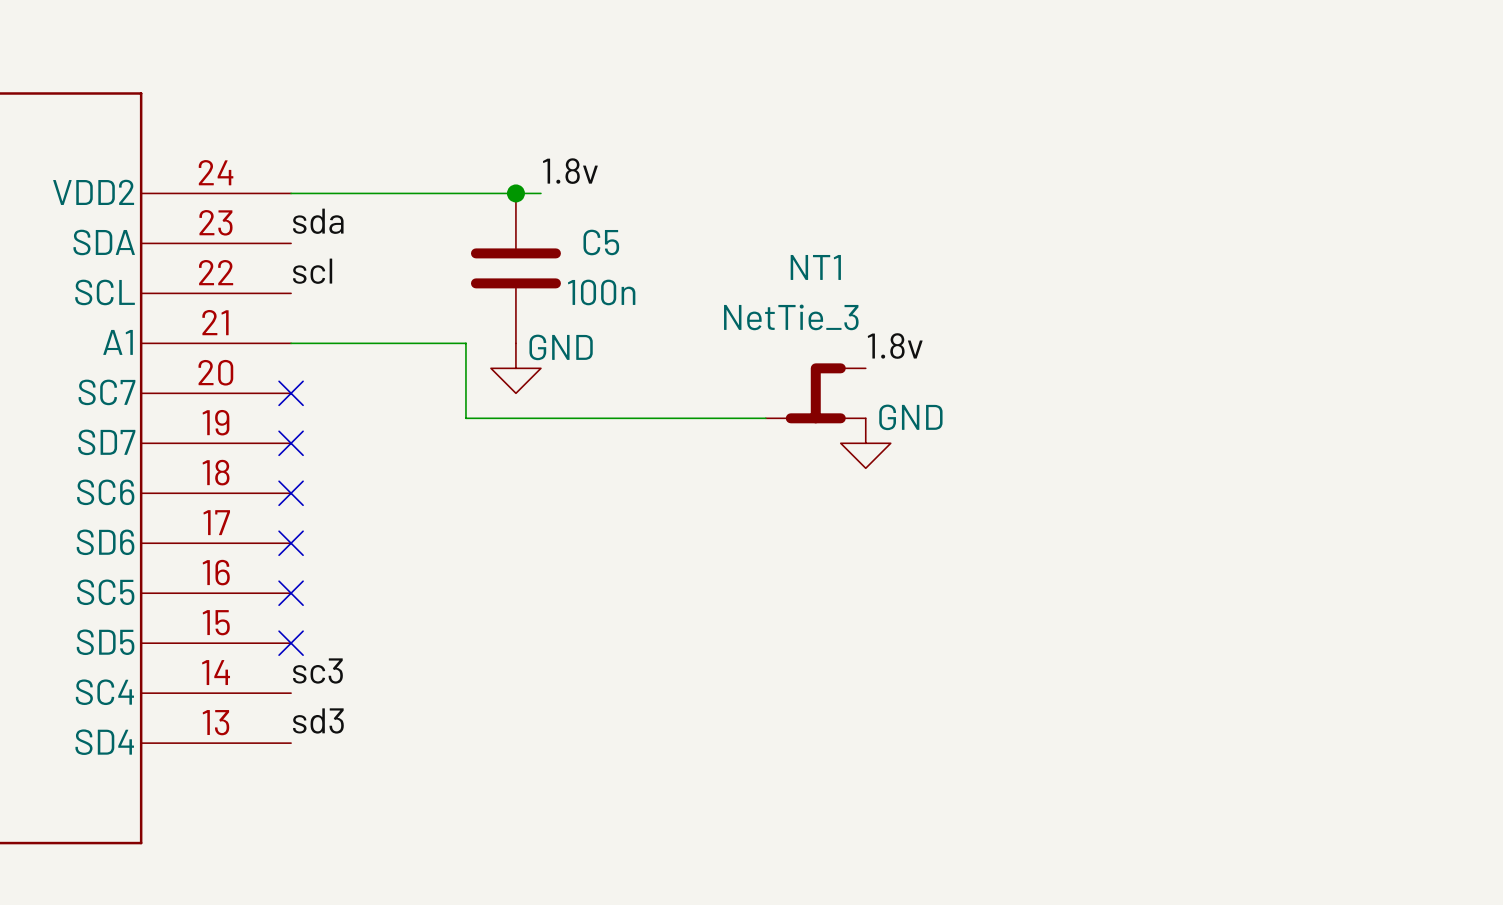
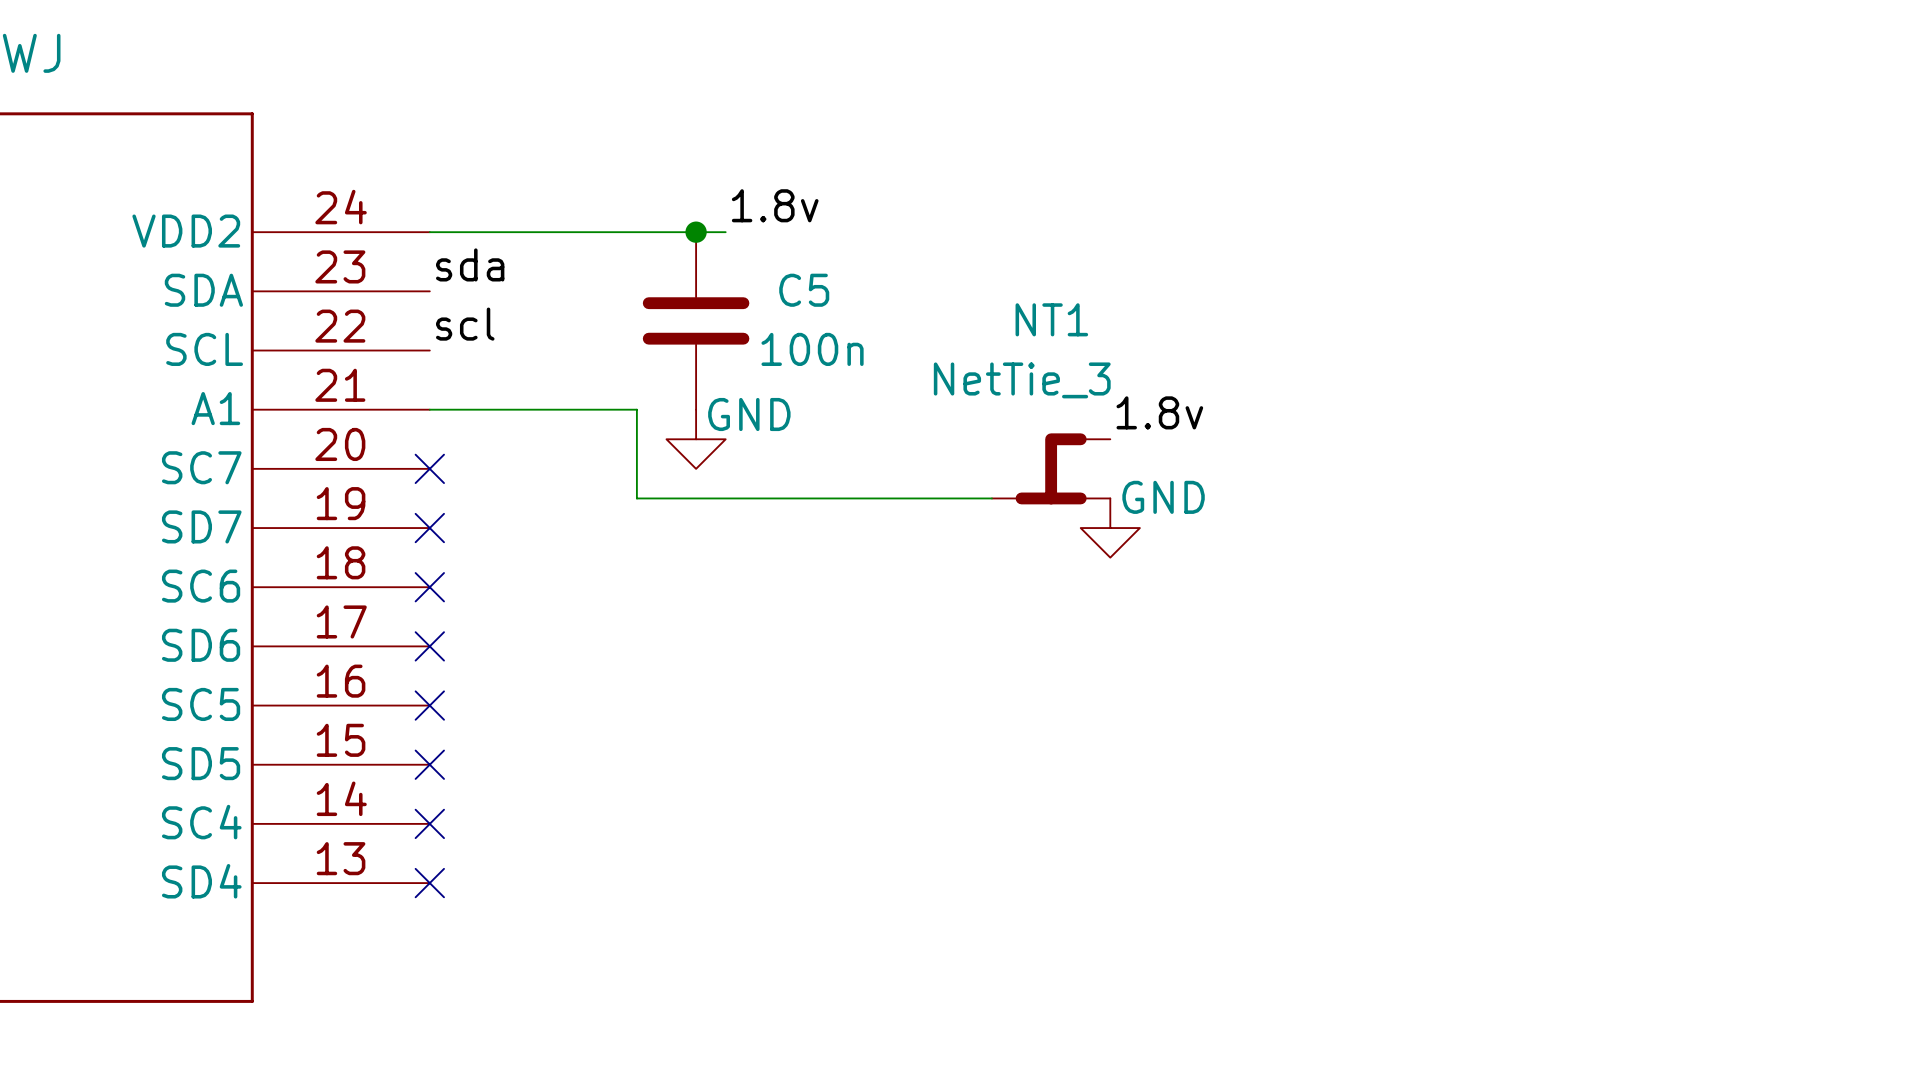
label: sc3 (317, 671) -> none
no-connect mark: none -> (429, 823)
label: sd3 (318, 720) -> none
no-connect mark: none -> (429, 883)

